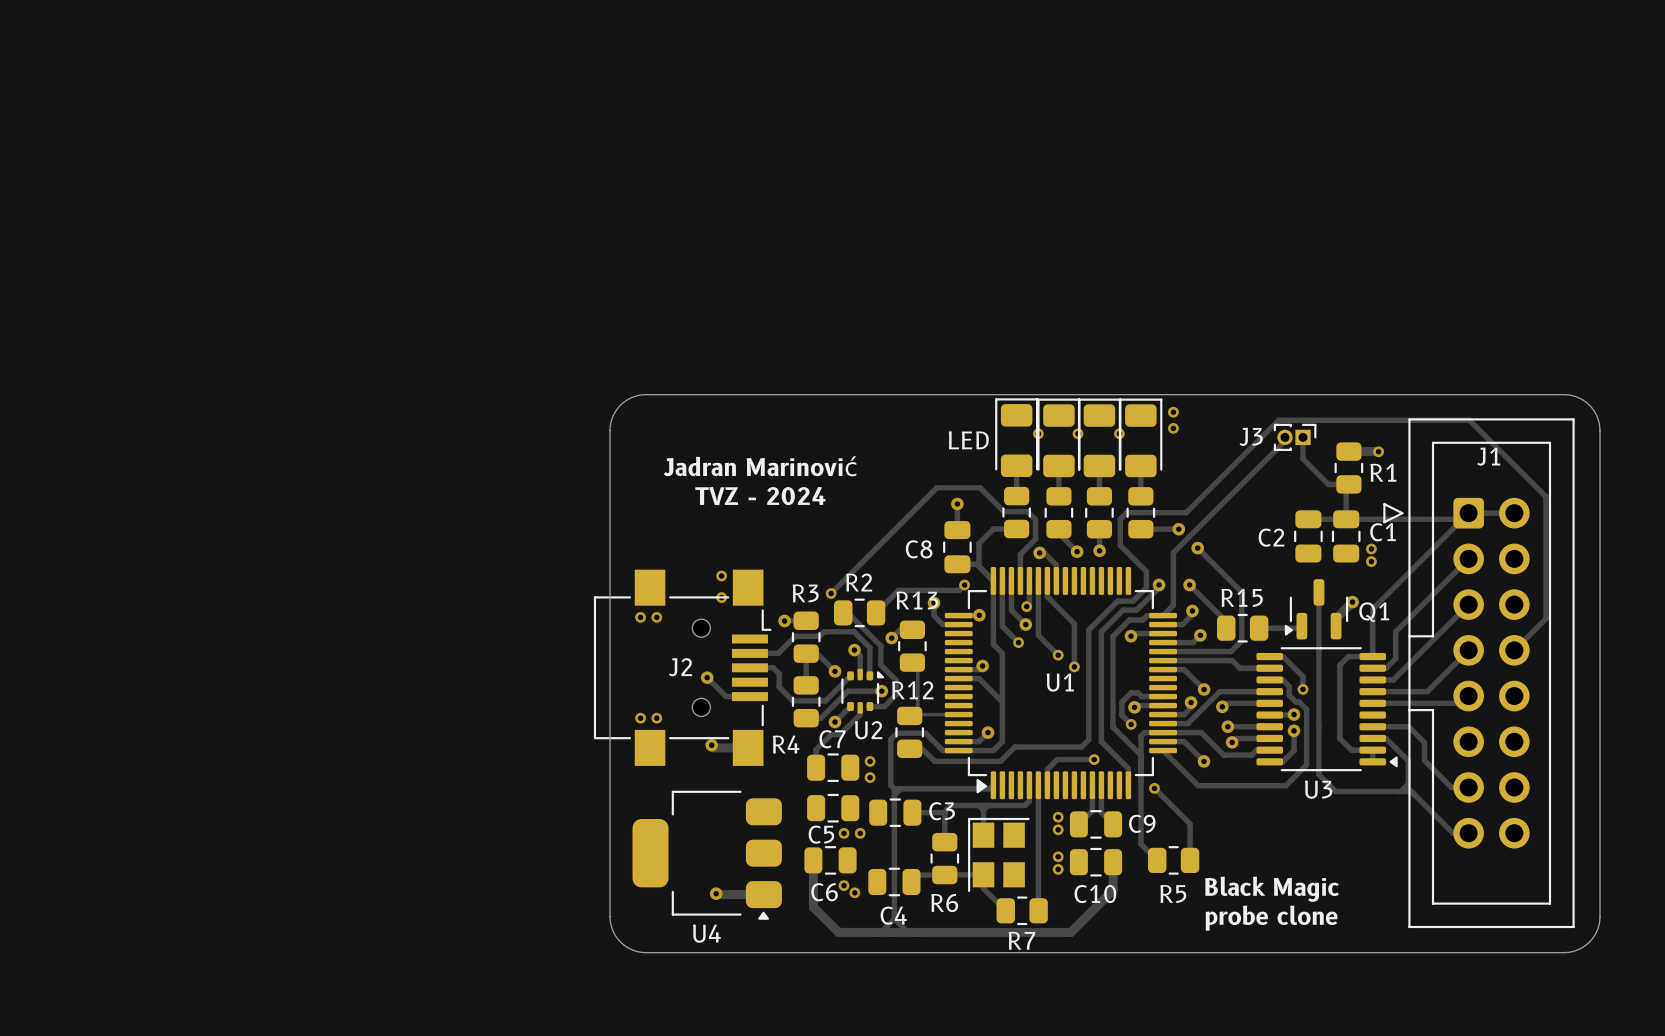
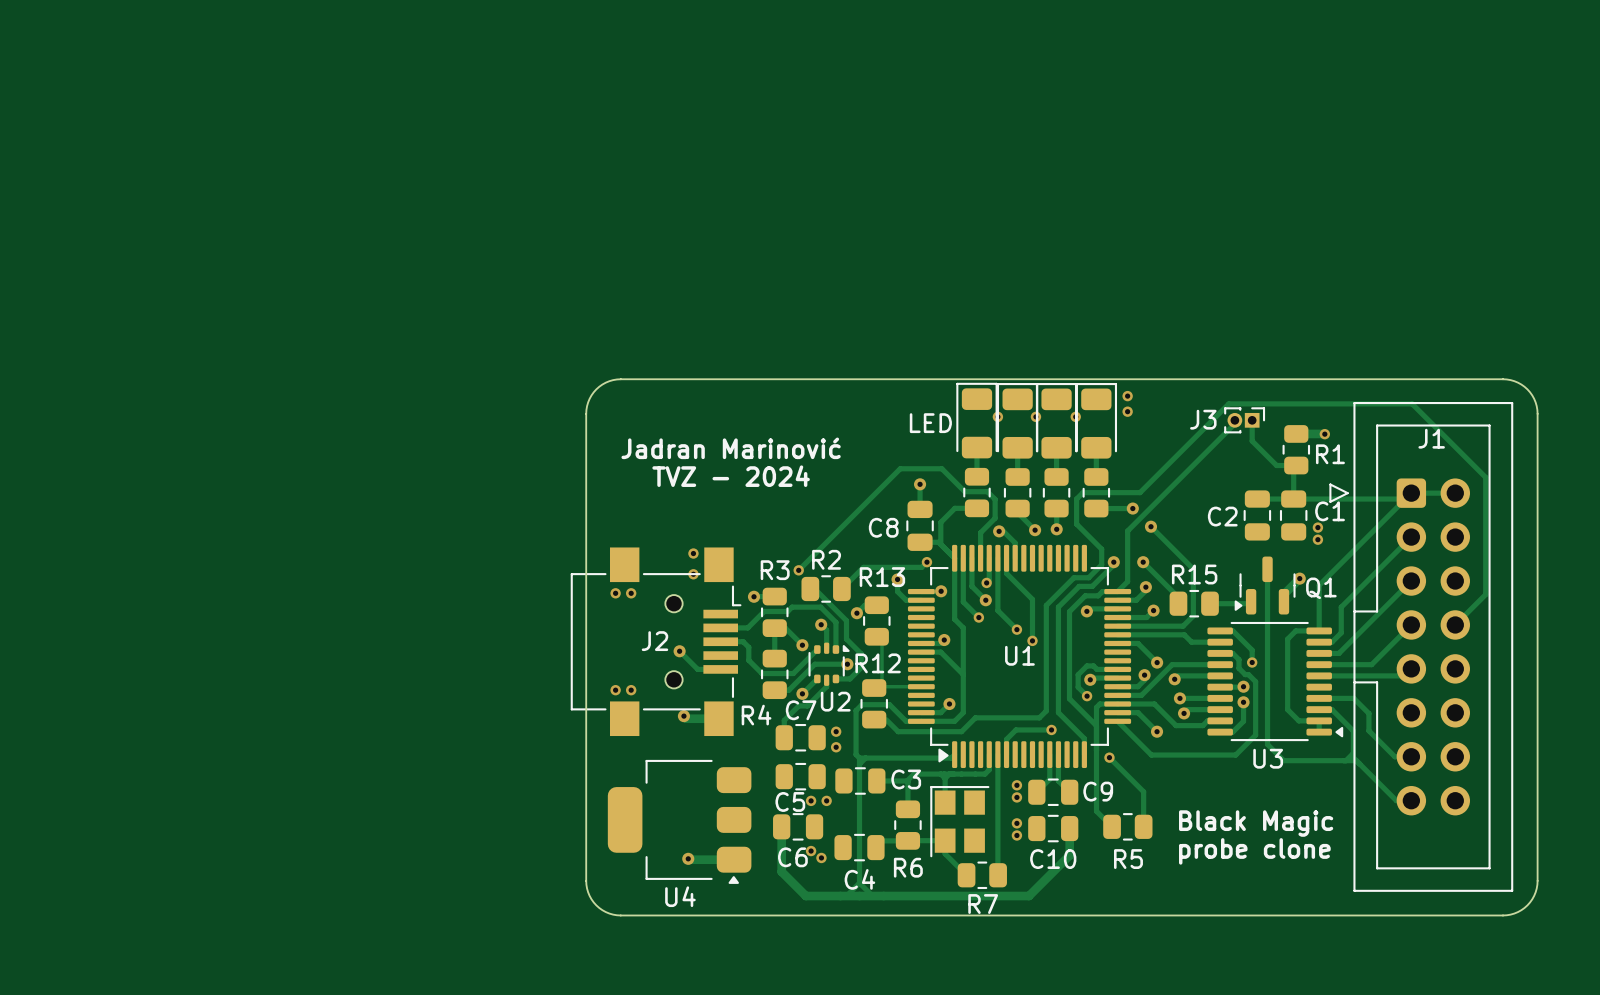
text position: Black Magic (1271, 889) -> Black Magic (1256, 823)
text position: probe clone (1271, 918) -> probe clone (1254, 851)

